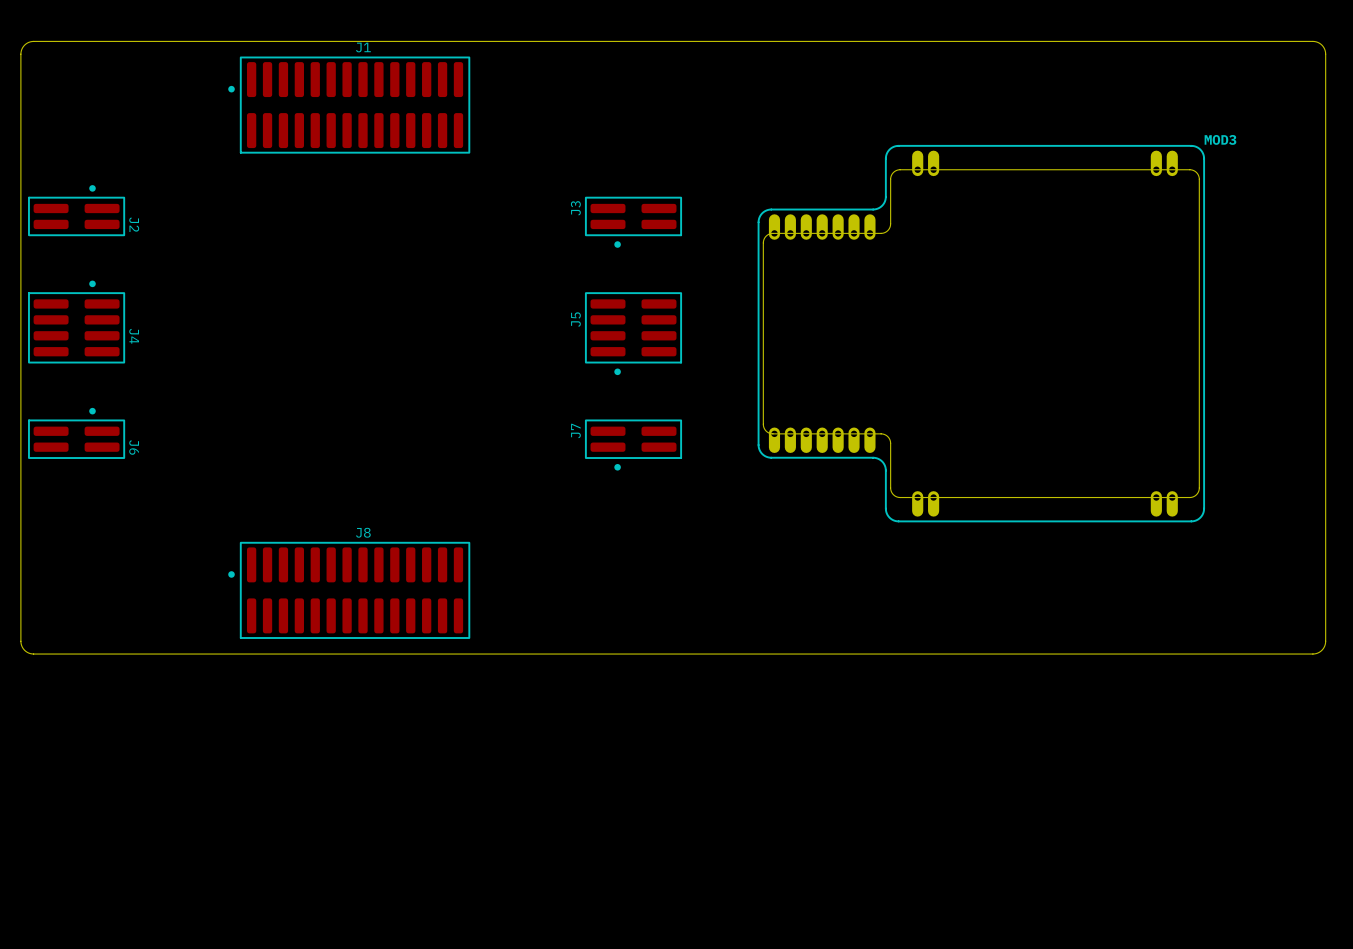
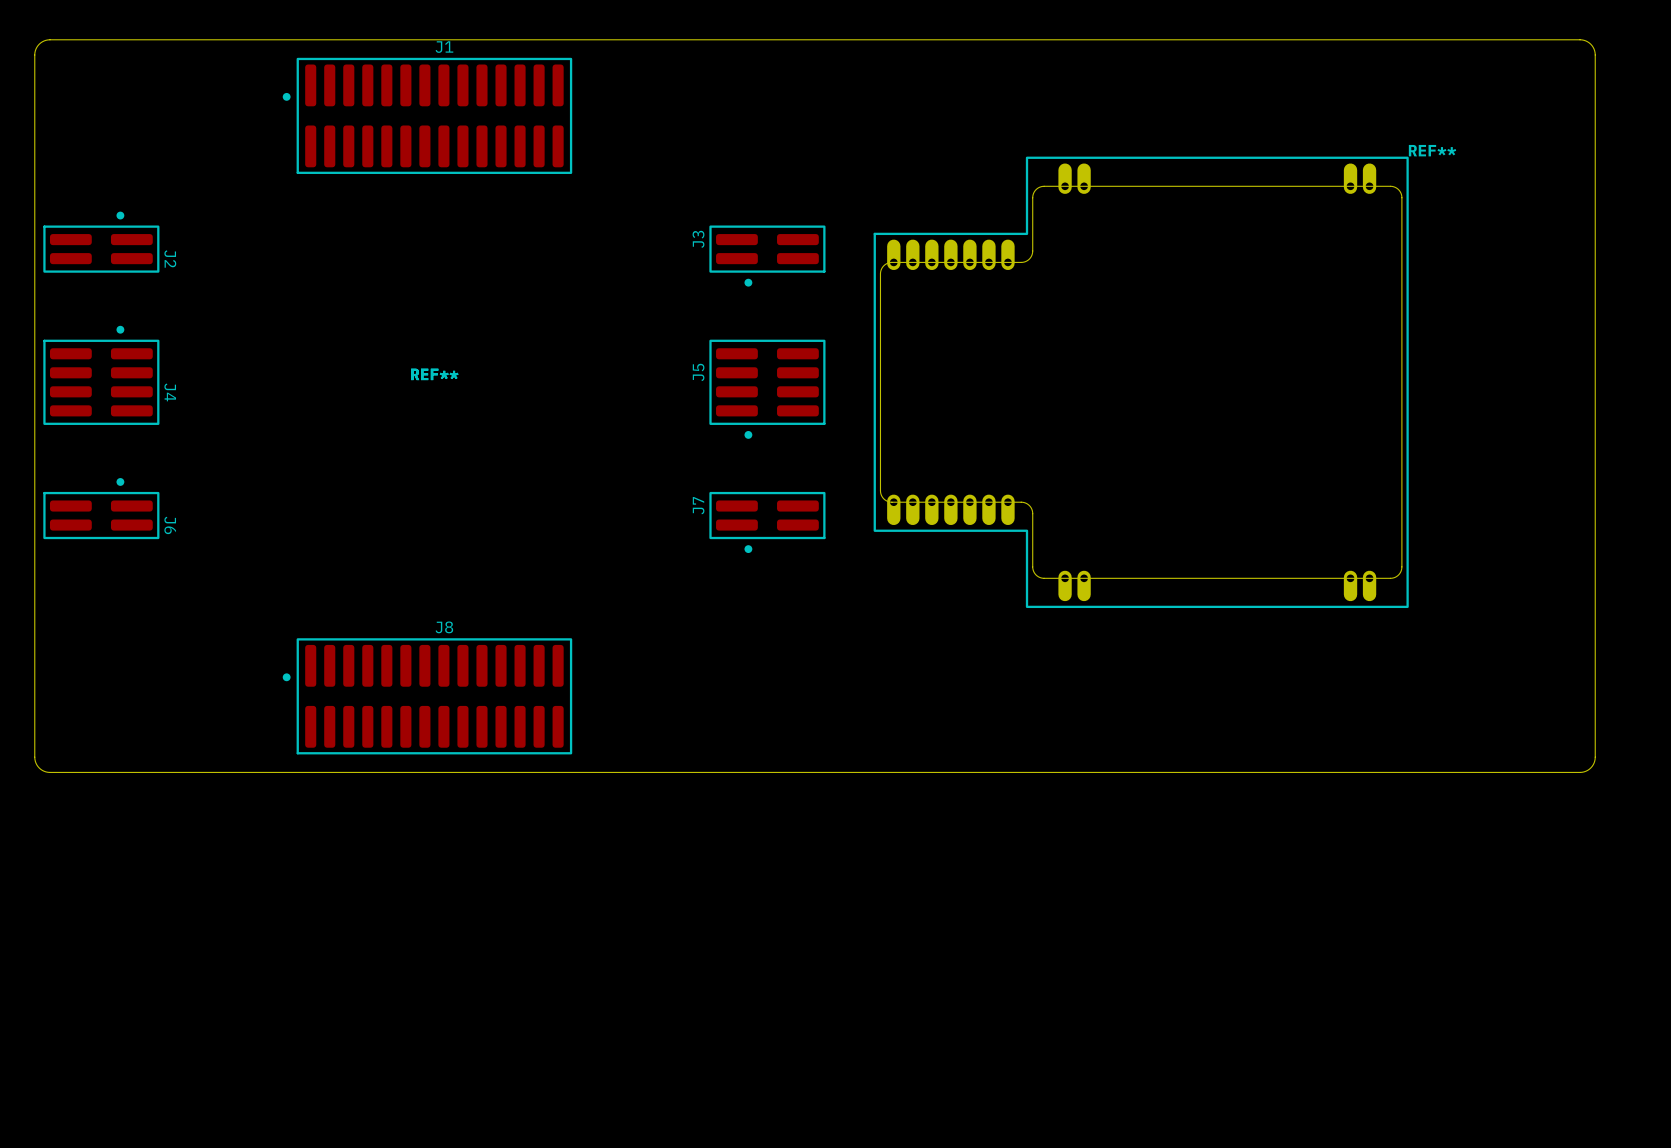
REF**: none -> (434, 374)
REF**: none -> (1141, 382)
MOD3: (981, 333) -> none

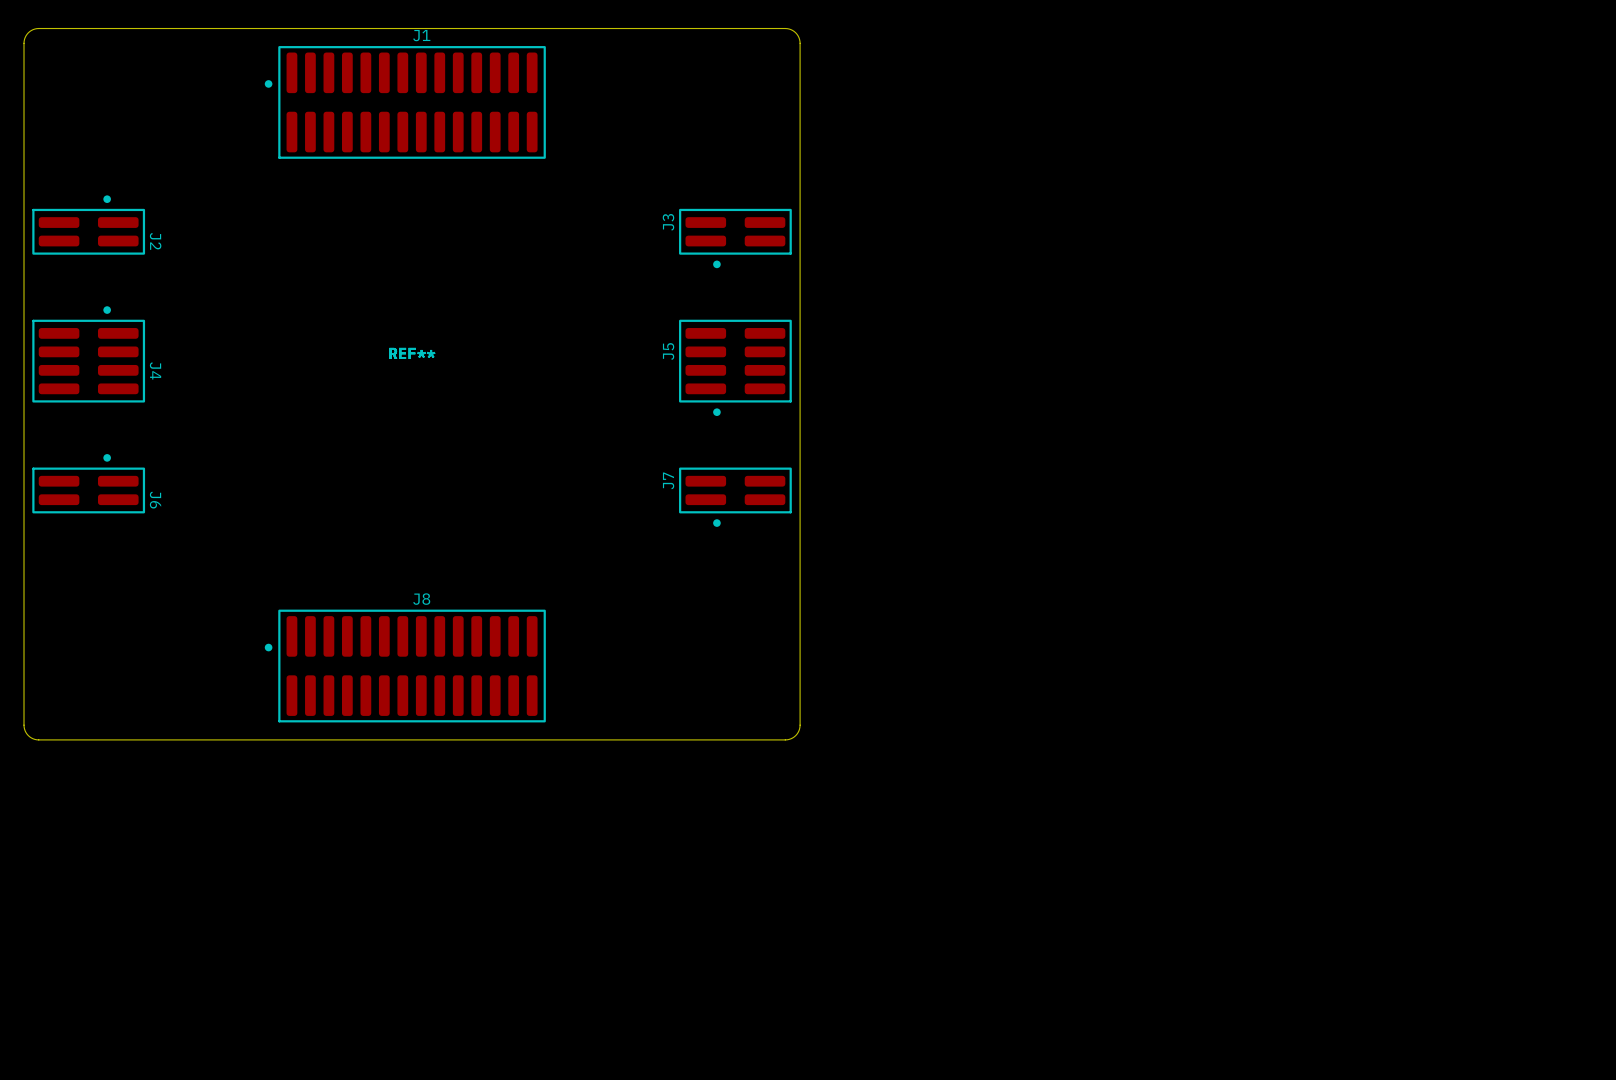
board edge: (818, 39) (1580, 39) (1590, 44) (1595, 55) (1595, 757) (1590, 767) (1580, 772) (818, 772) -> (785, 28) (795, 32) (800, 43) (800, 725) (795, 735) (785, 739)
REF**: (1141, 382) -> none

